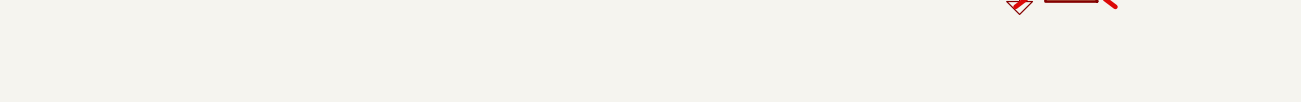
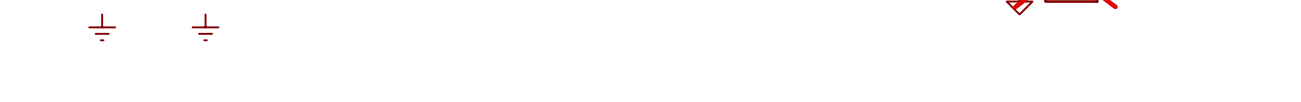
power symbol: none -> (102, 27)
power symbol: none -> (205, 27)

